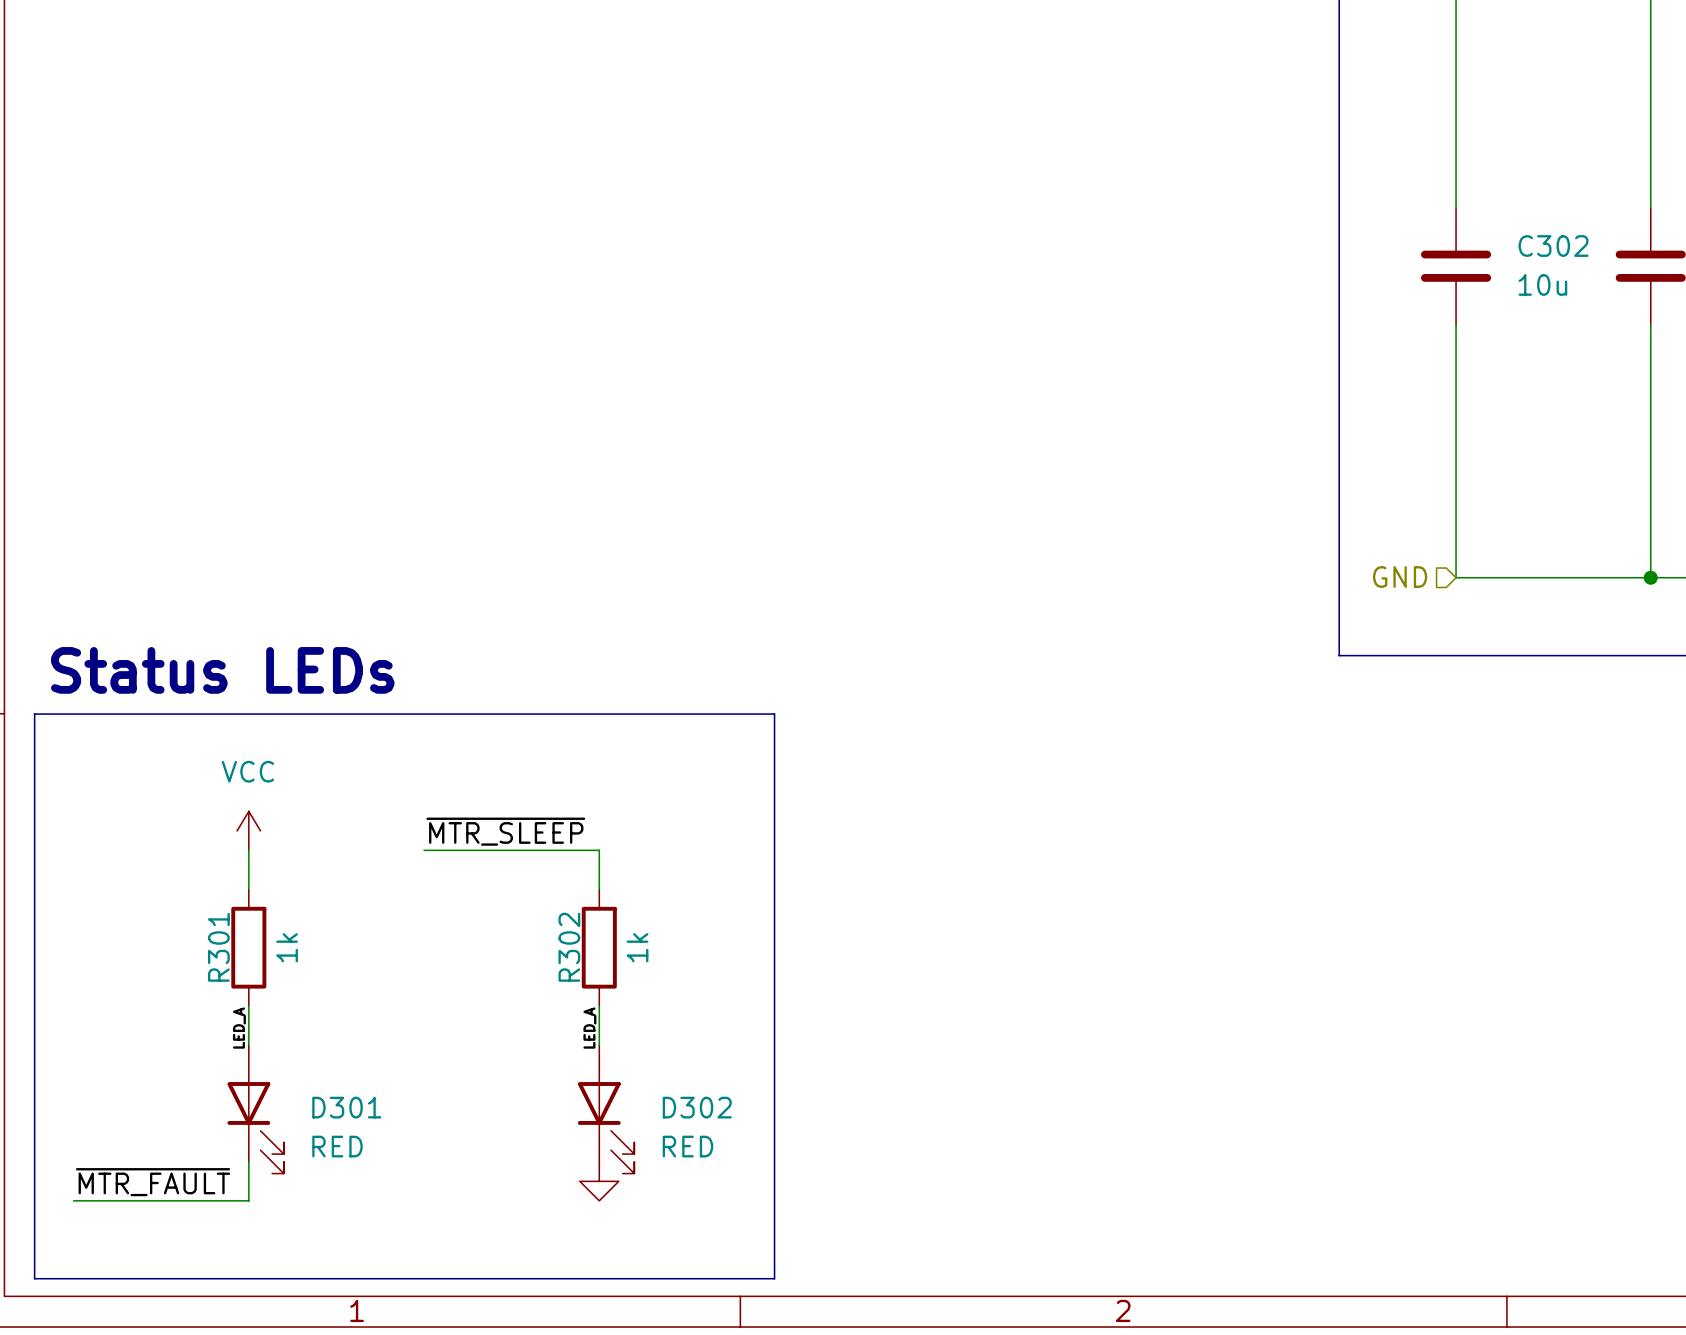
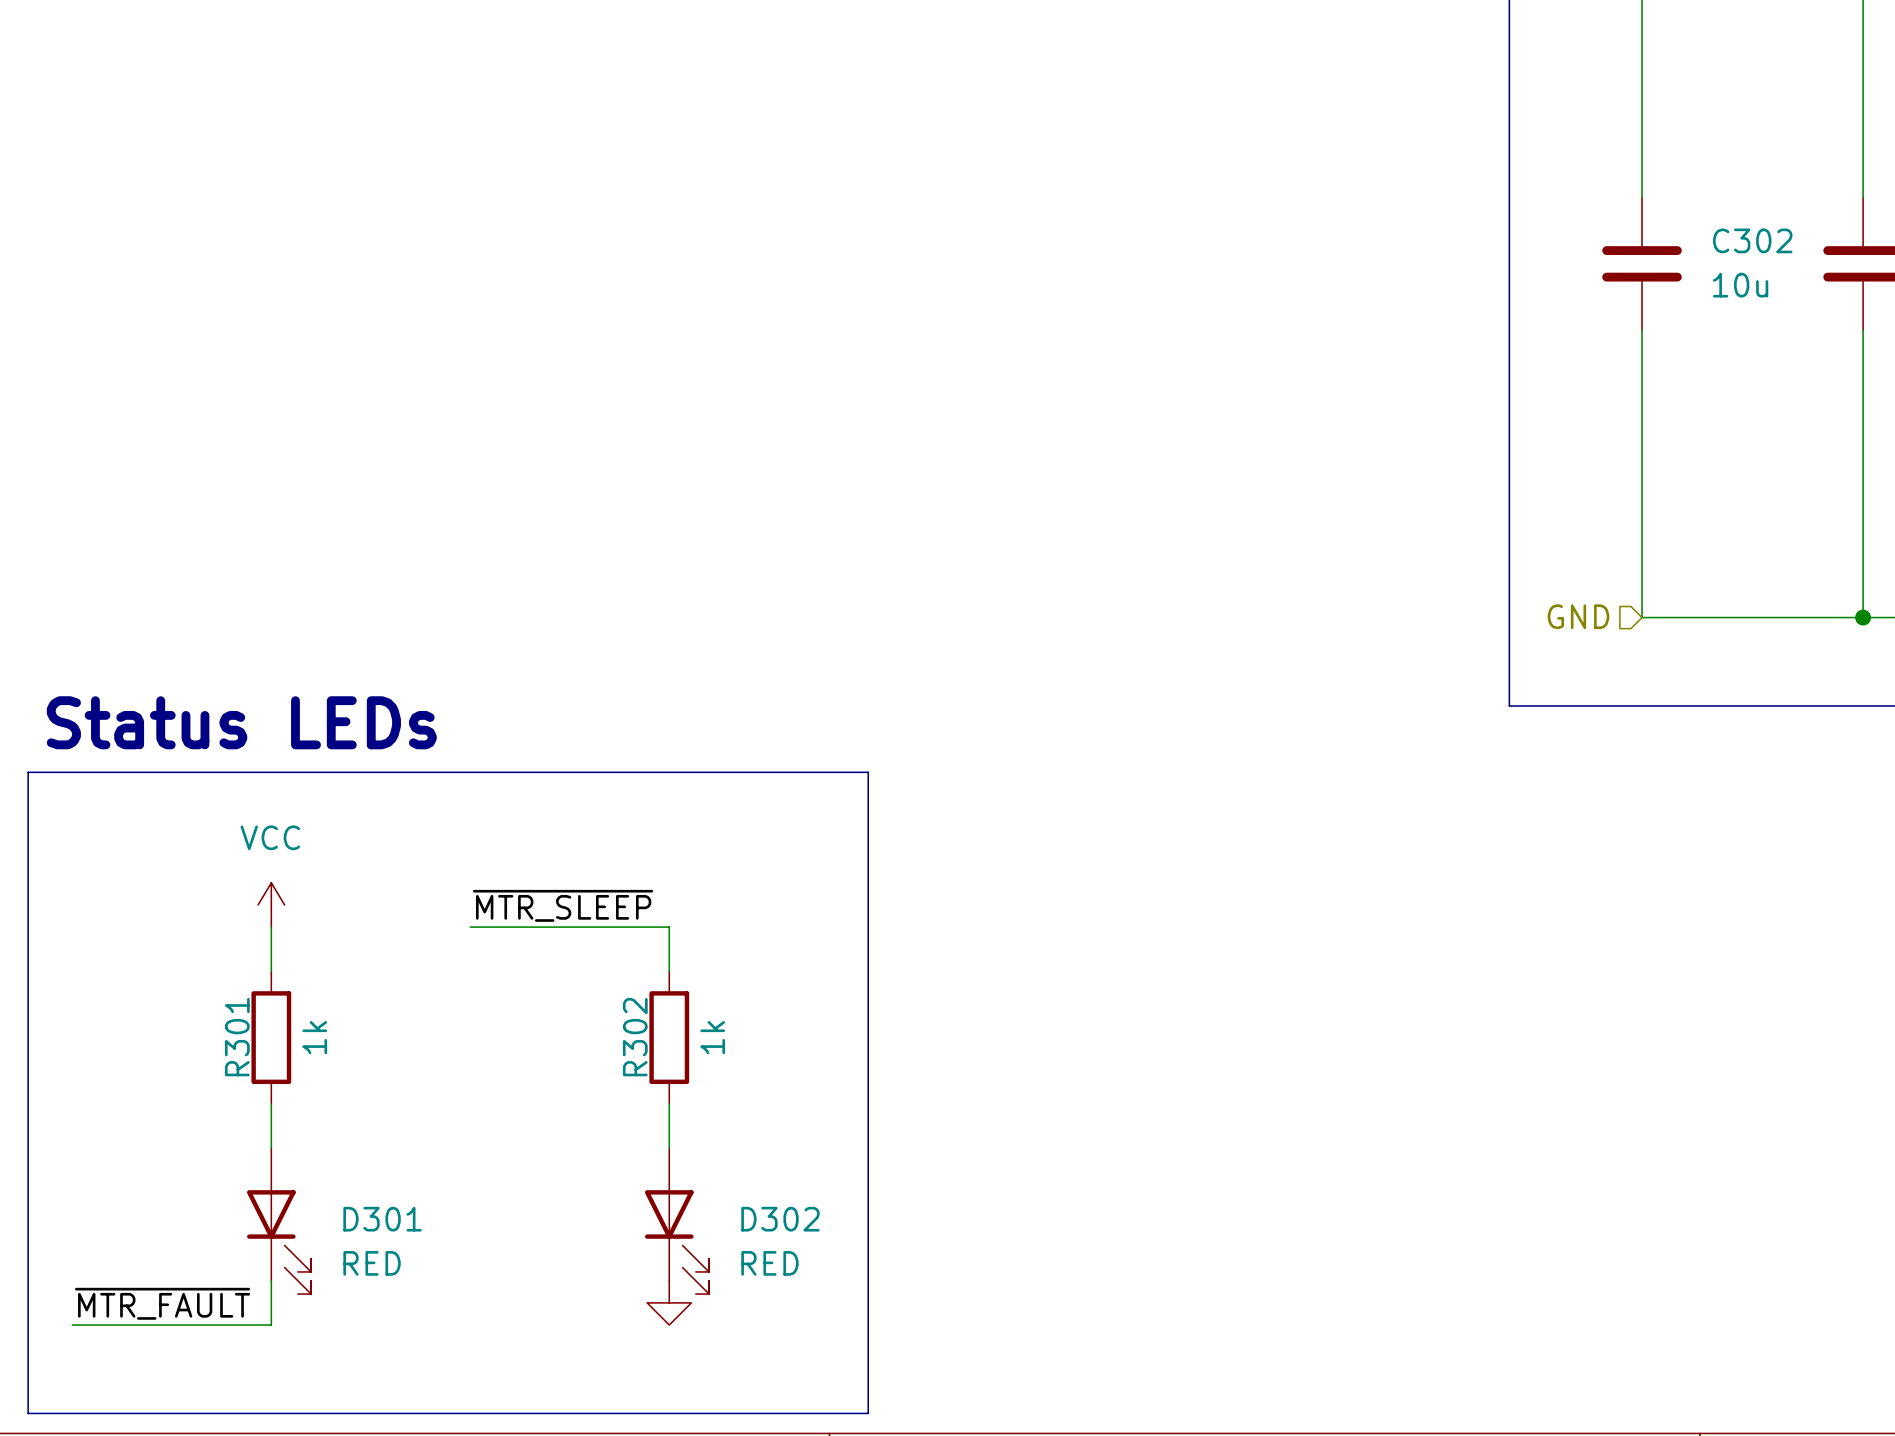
label: LED_A (239, 1028) -> none
label: LED_A (589, 1028) -> none

